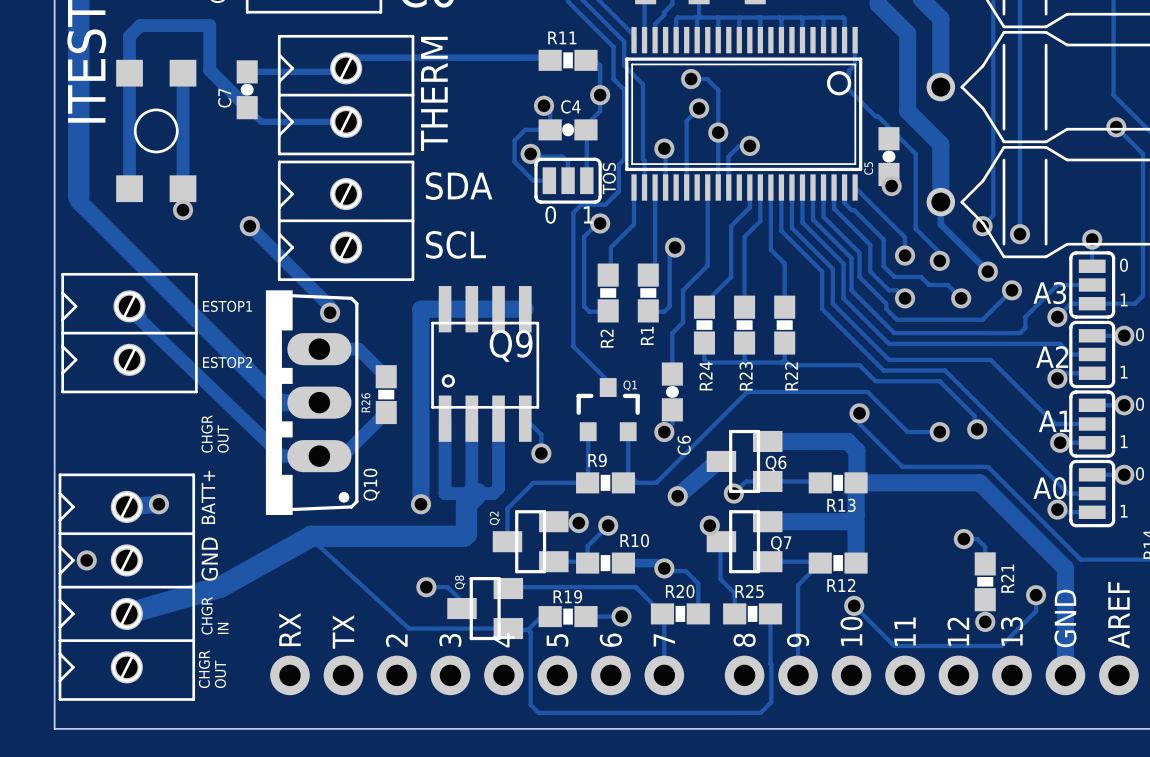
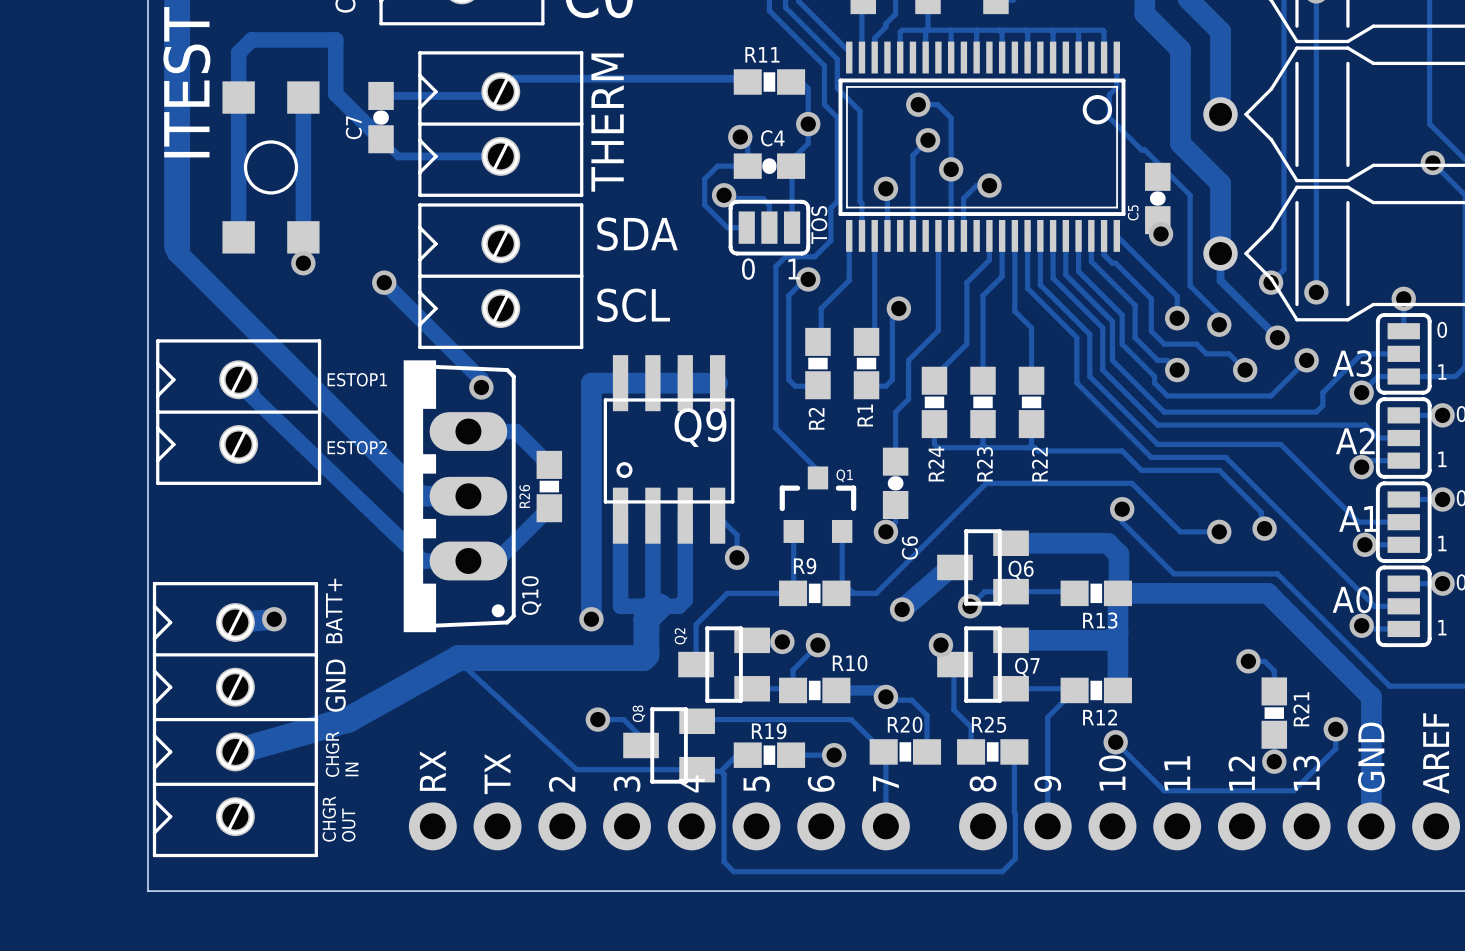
text: CHGR (207, 433) -> none
text: OUT (223, 439) -> none
via: (86, 560) -> none

